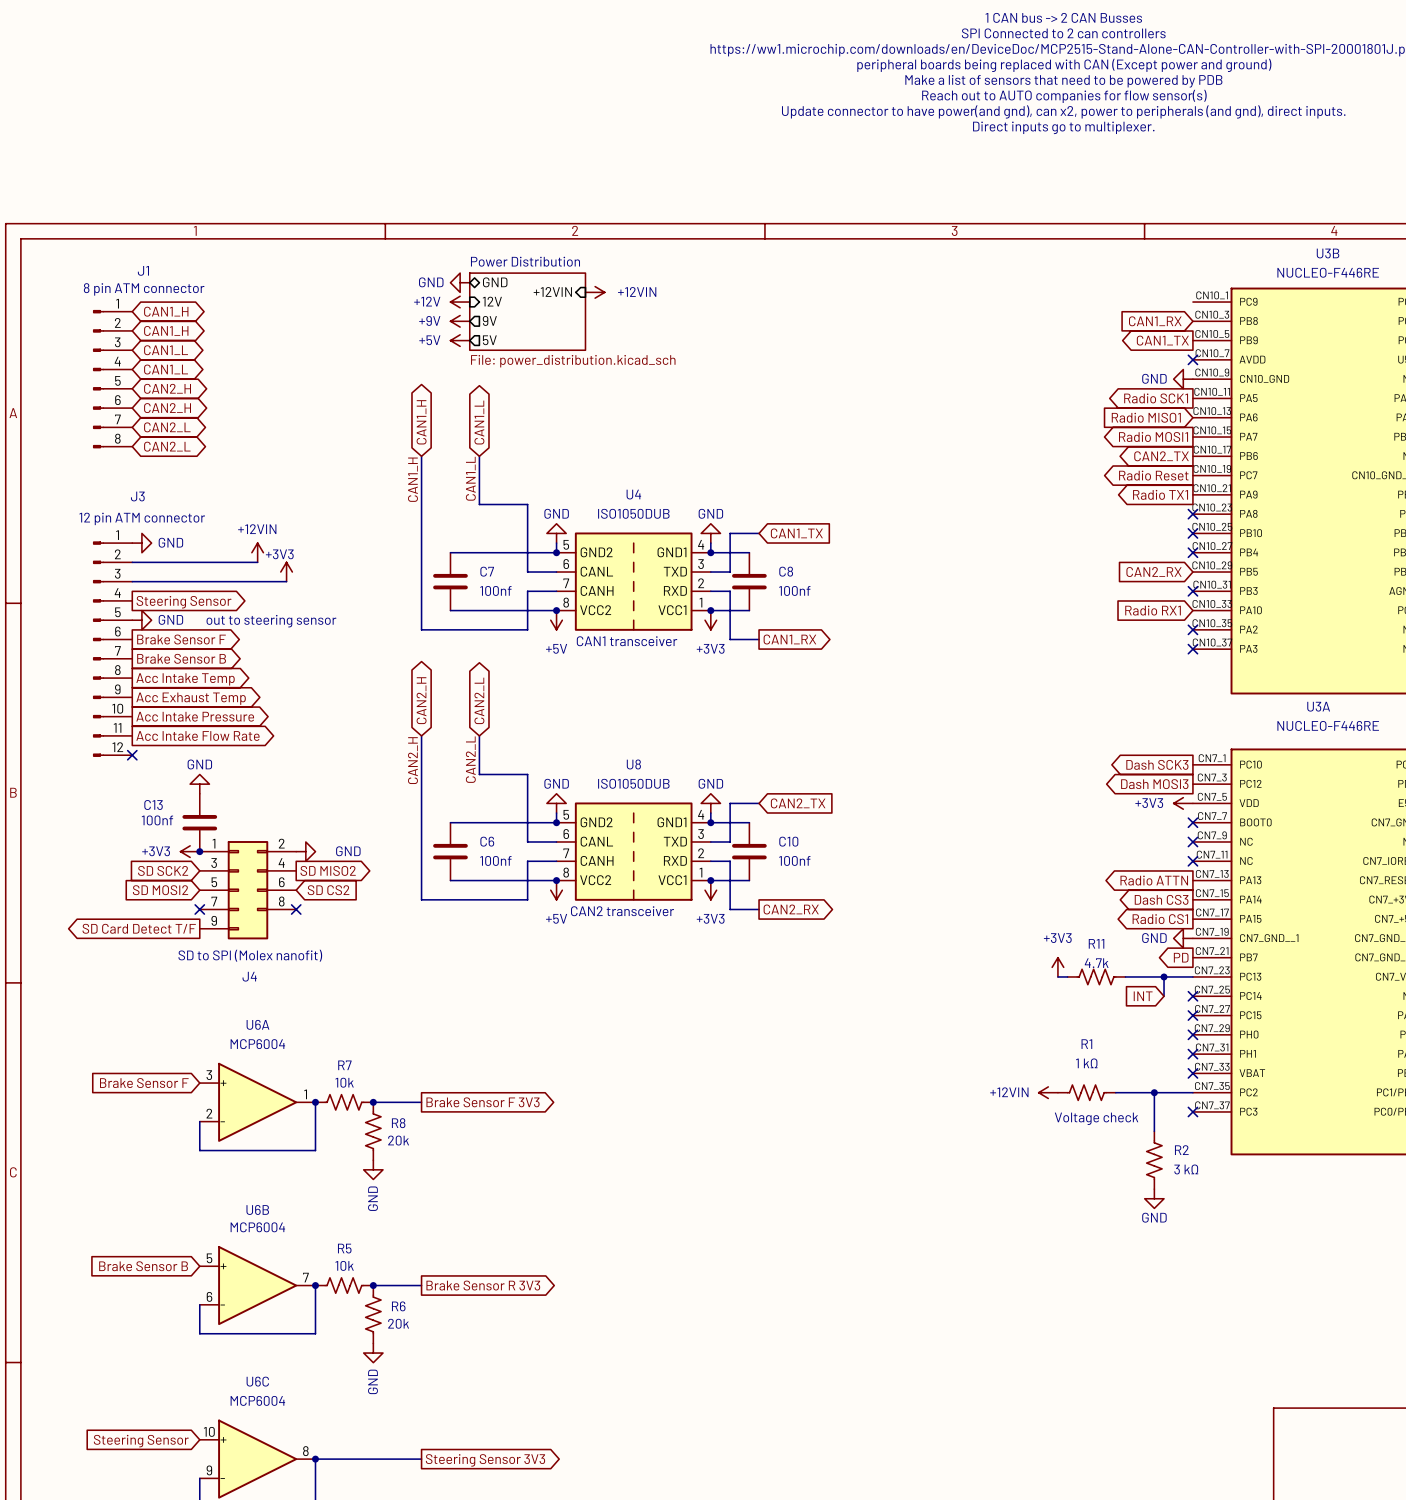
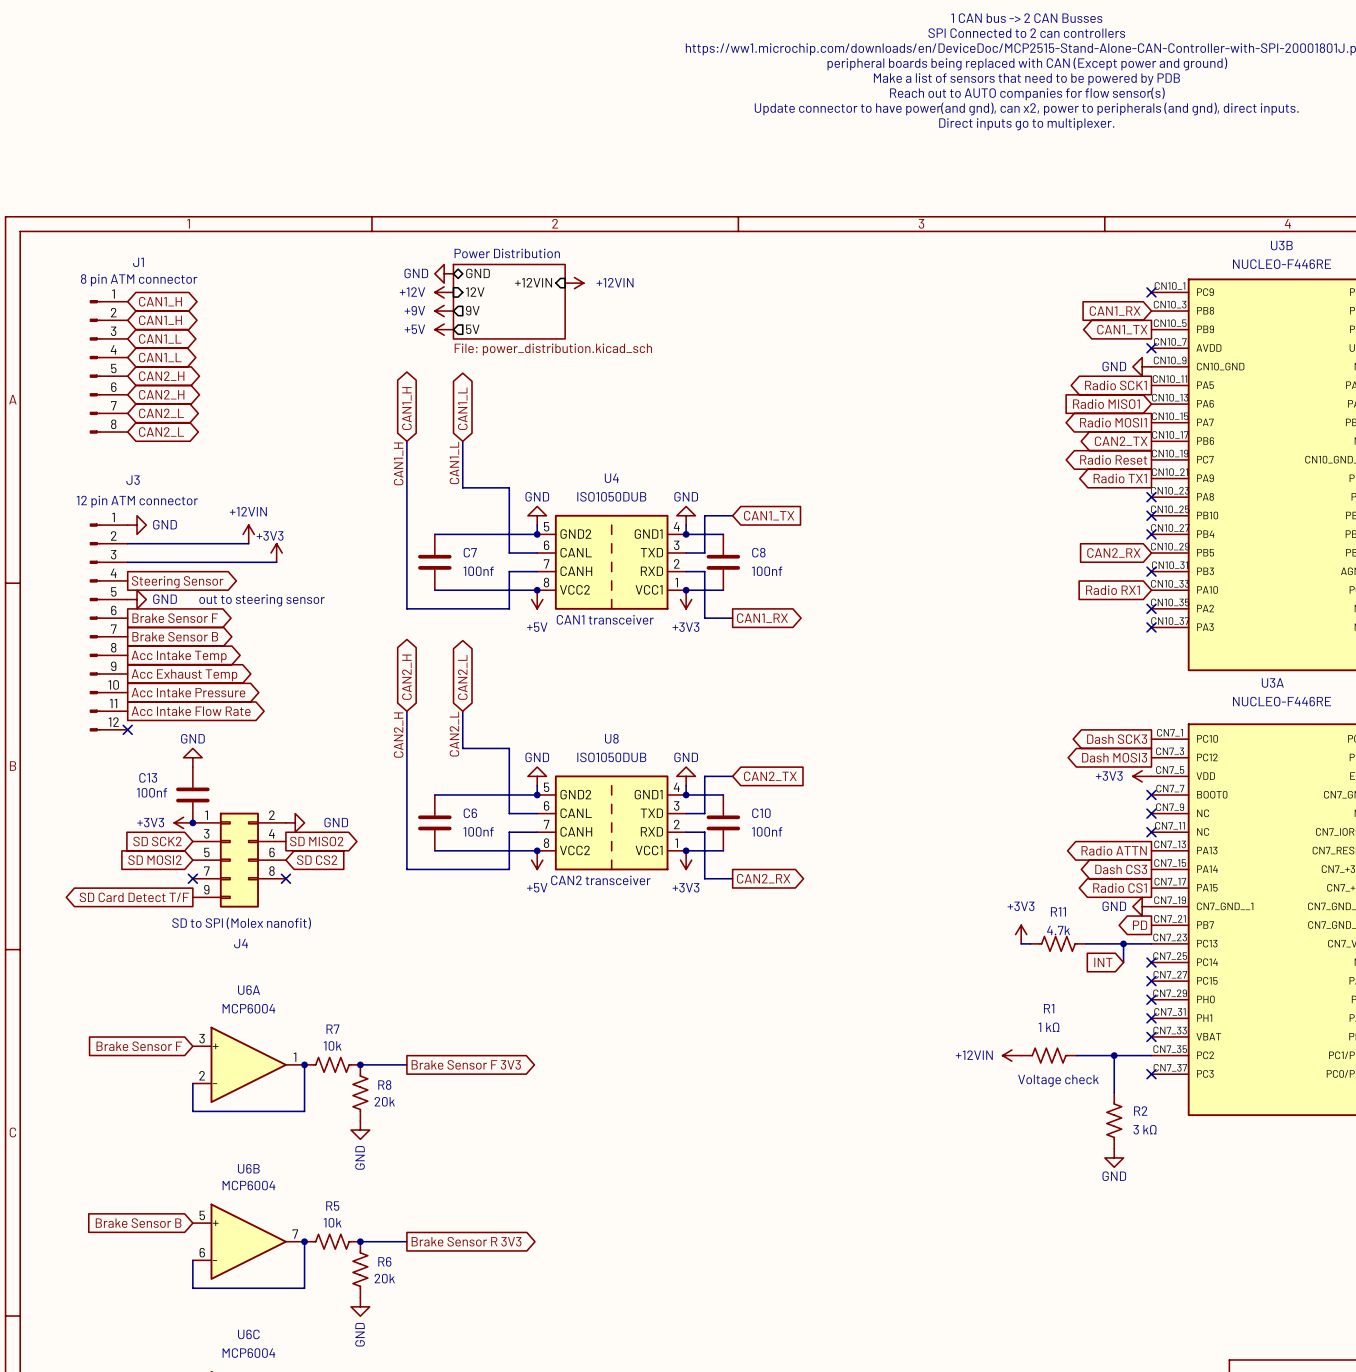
no-connect mark: none -> (1151, 292)

